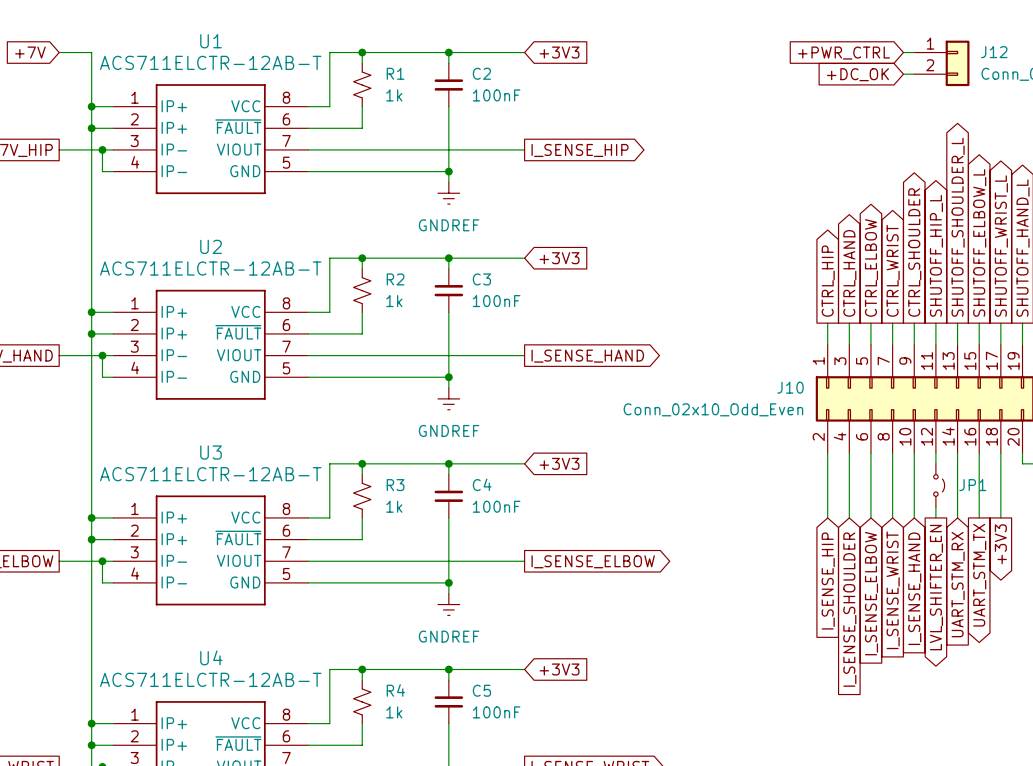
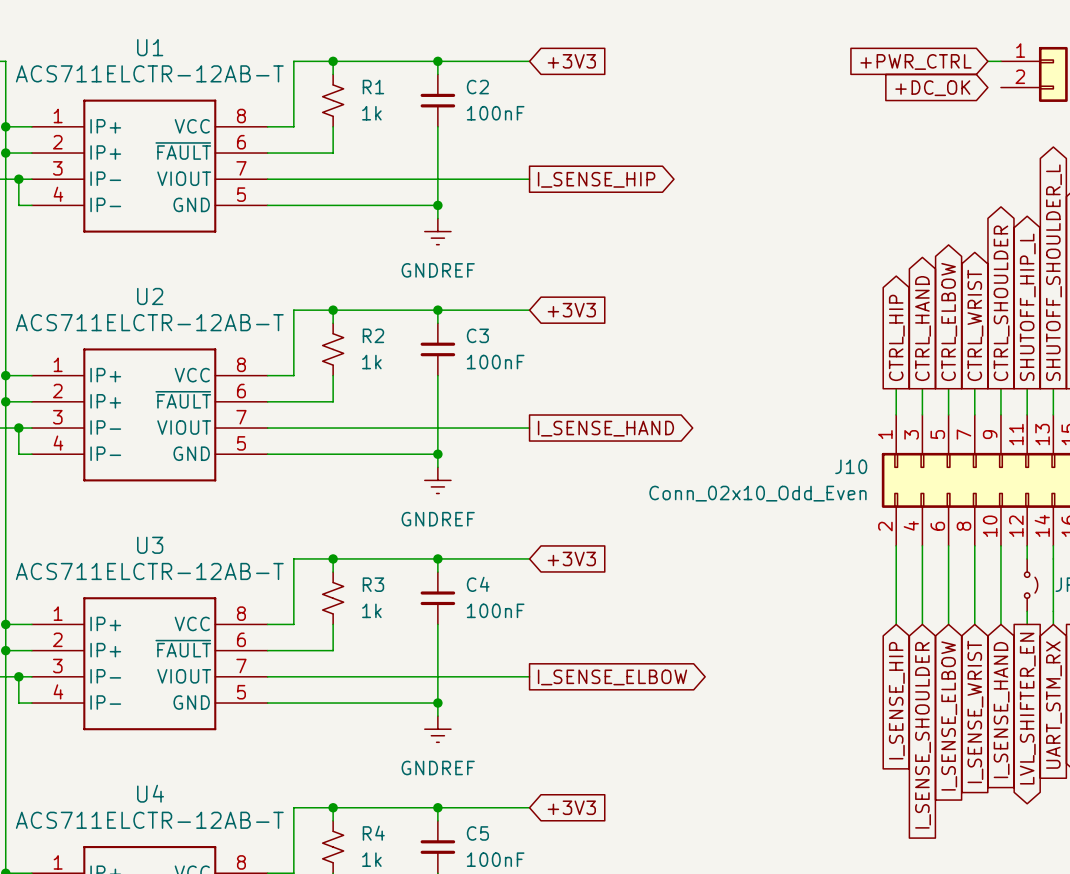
wire: (903, 74) (914, 74) -> none

